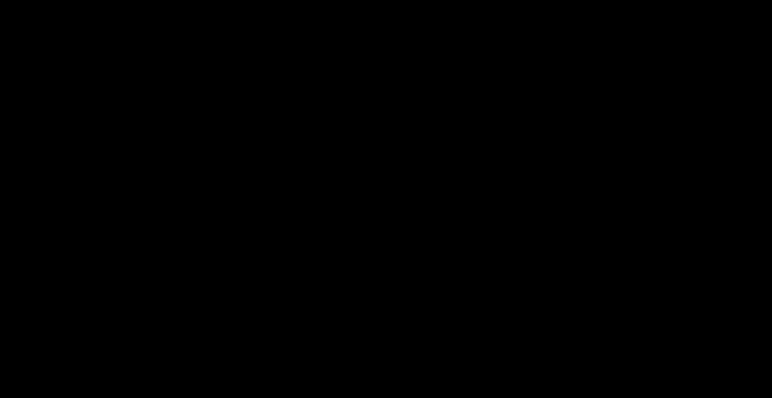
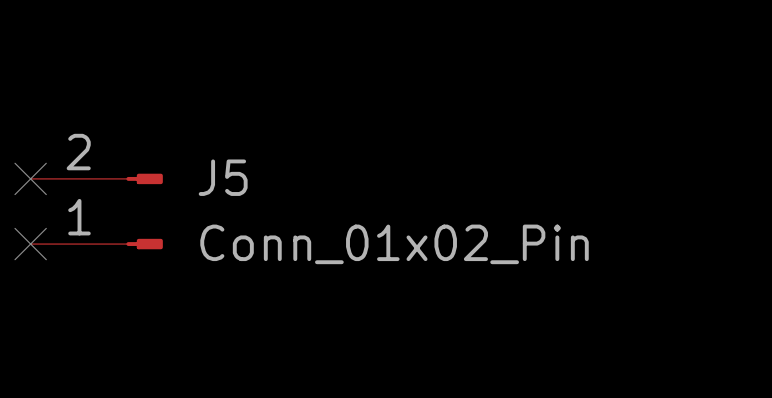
no-connect mark: none -> (30, 178)
J5: none -> Conn_01x02_Pin (96, 211)
no-connect mark: none -> (30, 244)

